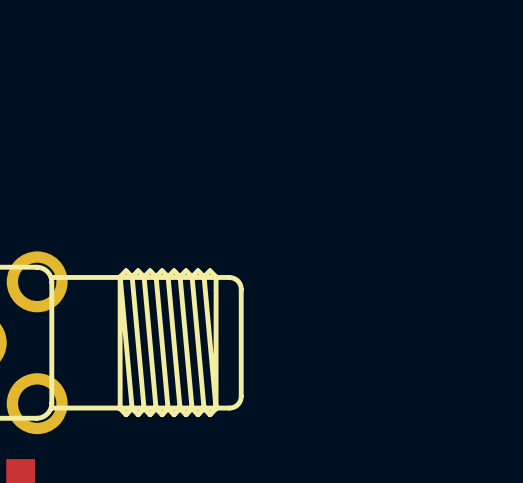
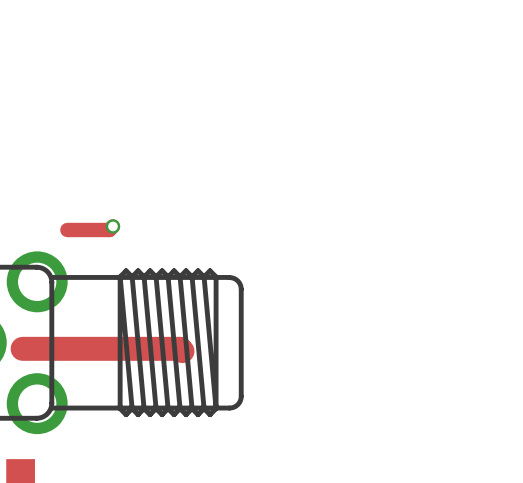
track: none -> (112, 226) (109, 230) (67, 230)
via: none -> (112, 226)
track: none -> (22, 348) (180, 348) (182, 351)

